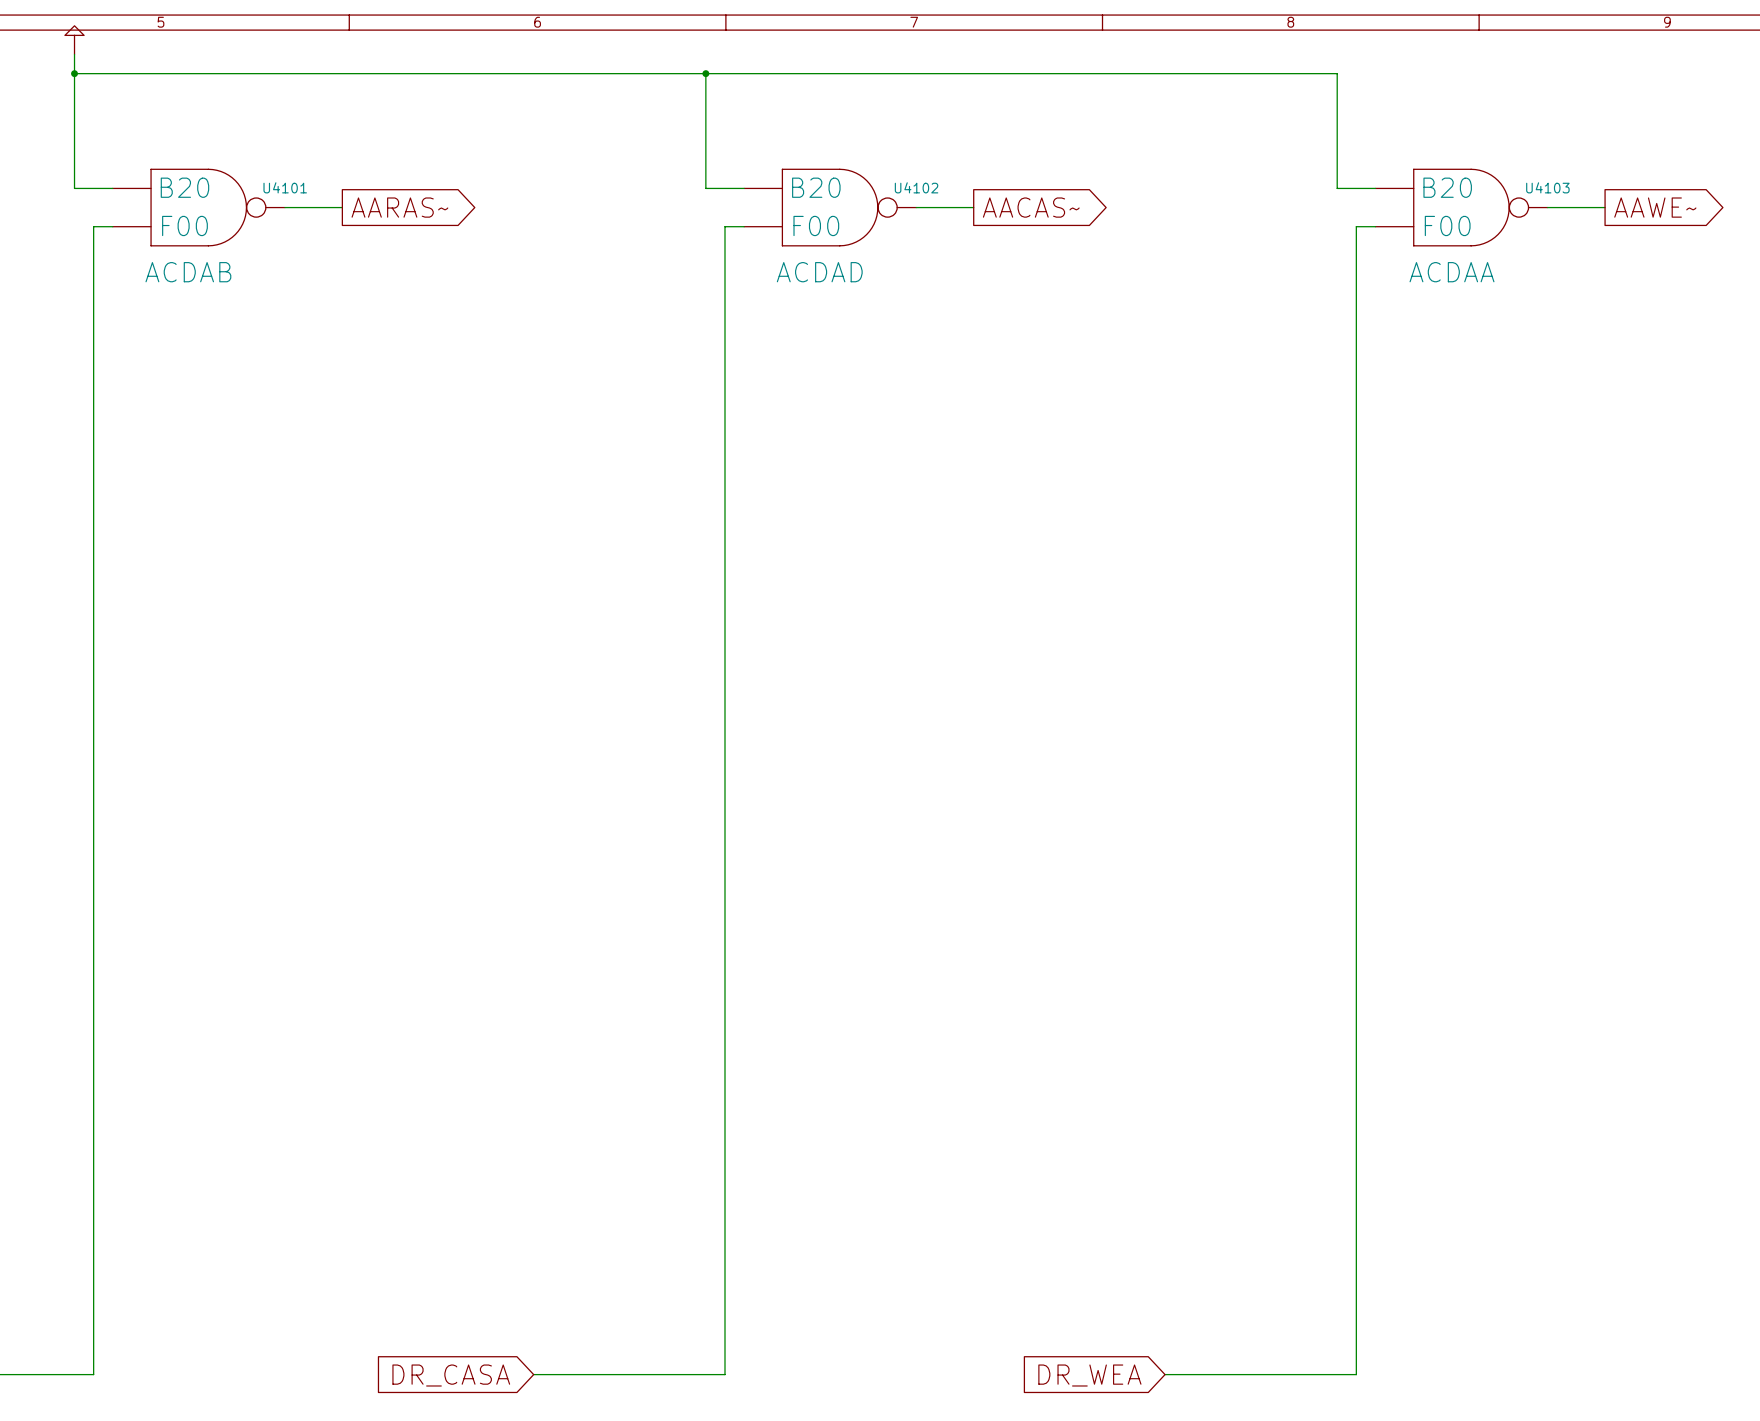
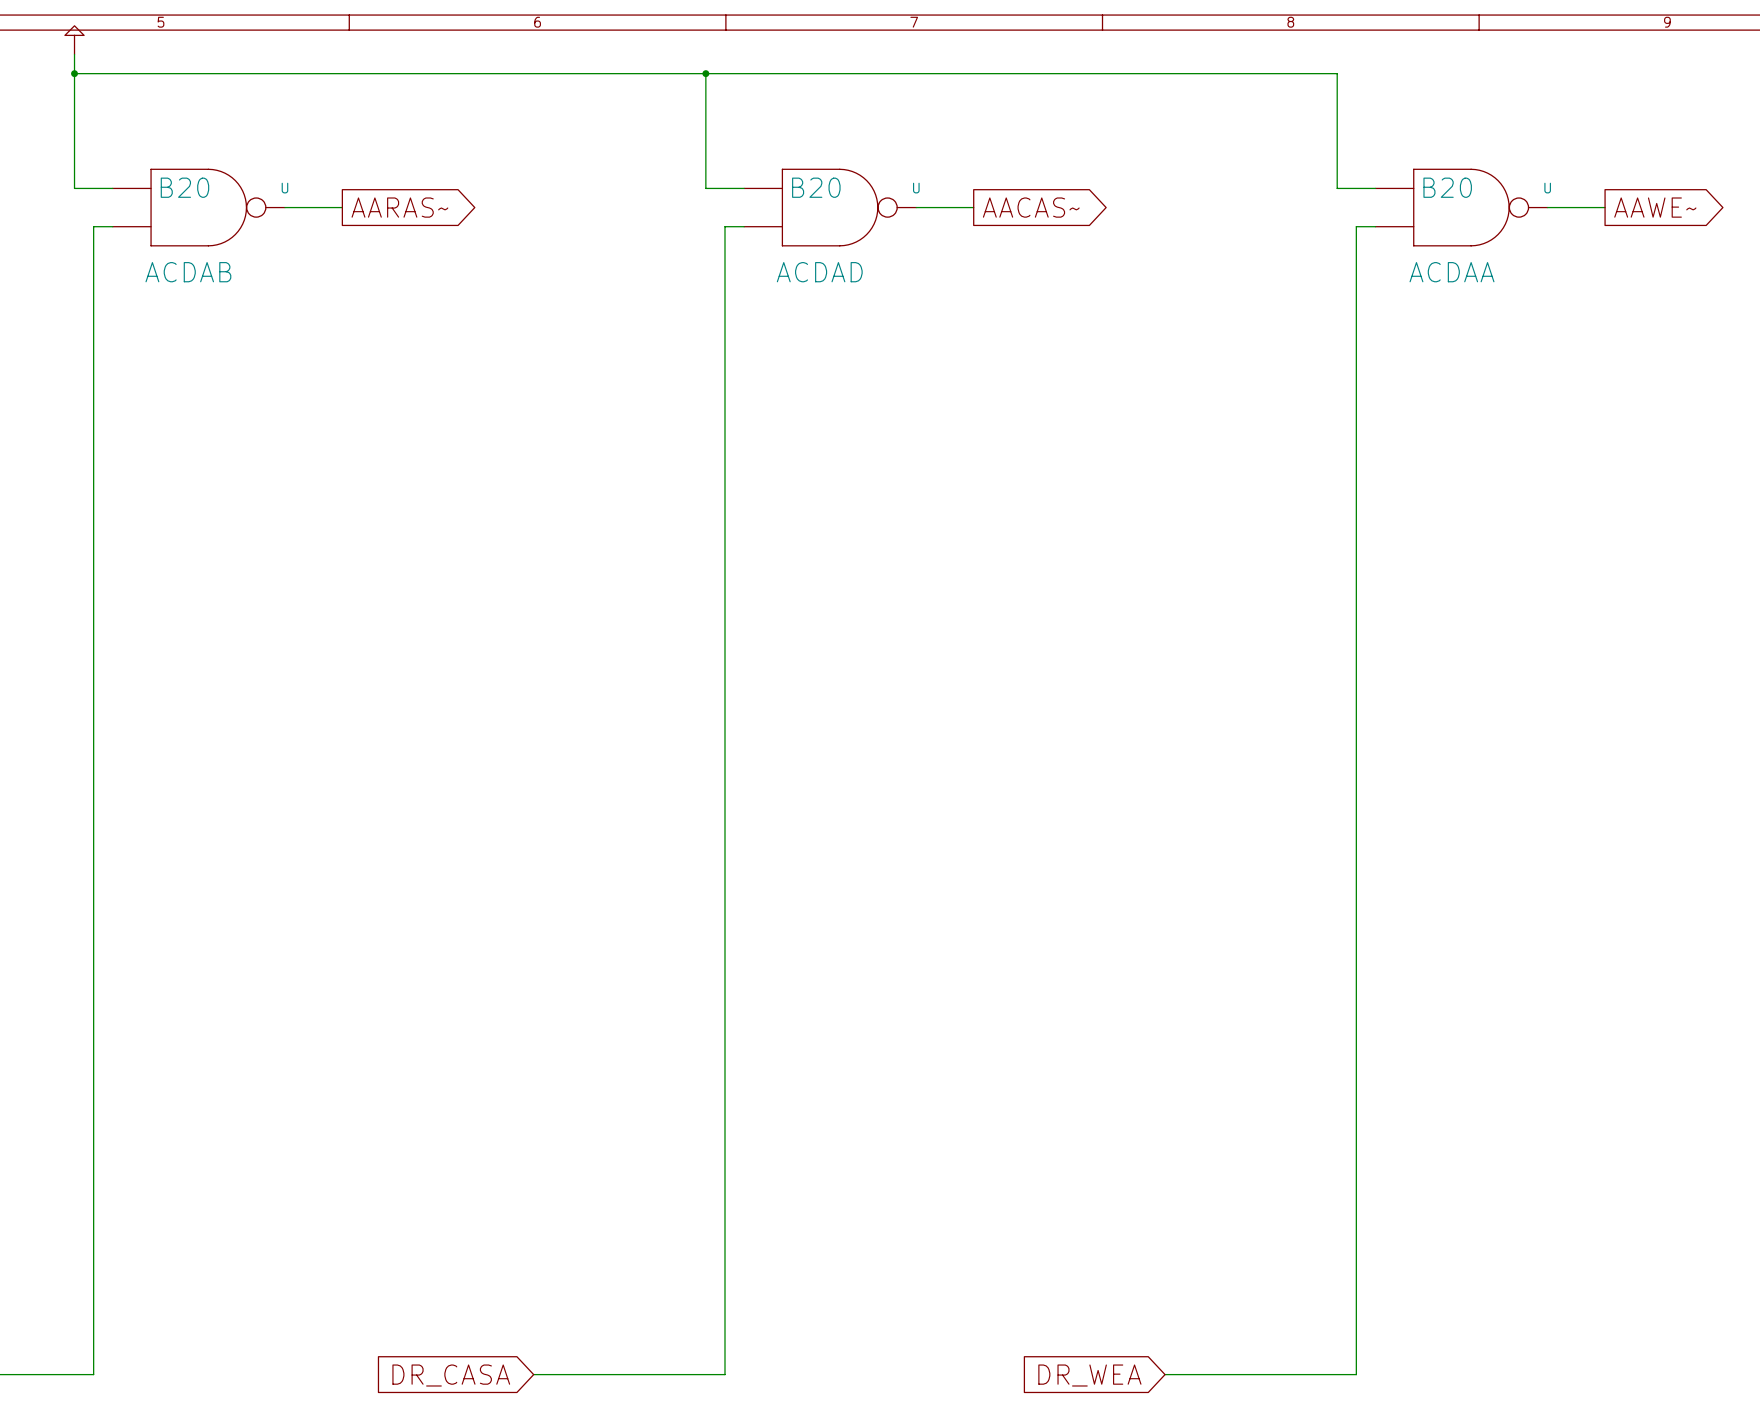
U4101 name: U4101 (285, 187) -> U (284, 188)
U4102 name: U4102 (916, 187) -> U (916, 188)
U4103 name: U4103 (1547, 187) -> U (1547, 188)
U4101 value: F00 (184, 225) -> none
U4102 value: F00 (816, 225) -> none
U4103 value: F00 (1447, 225) -> none

